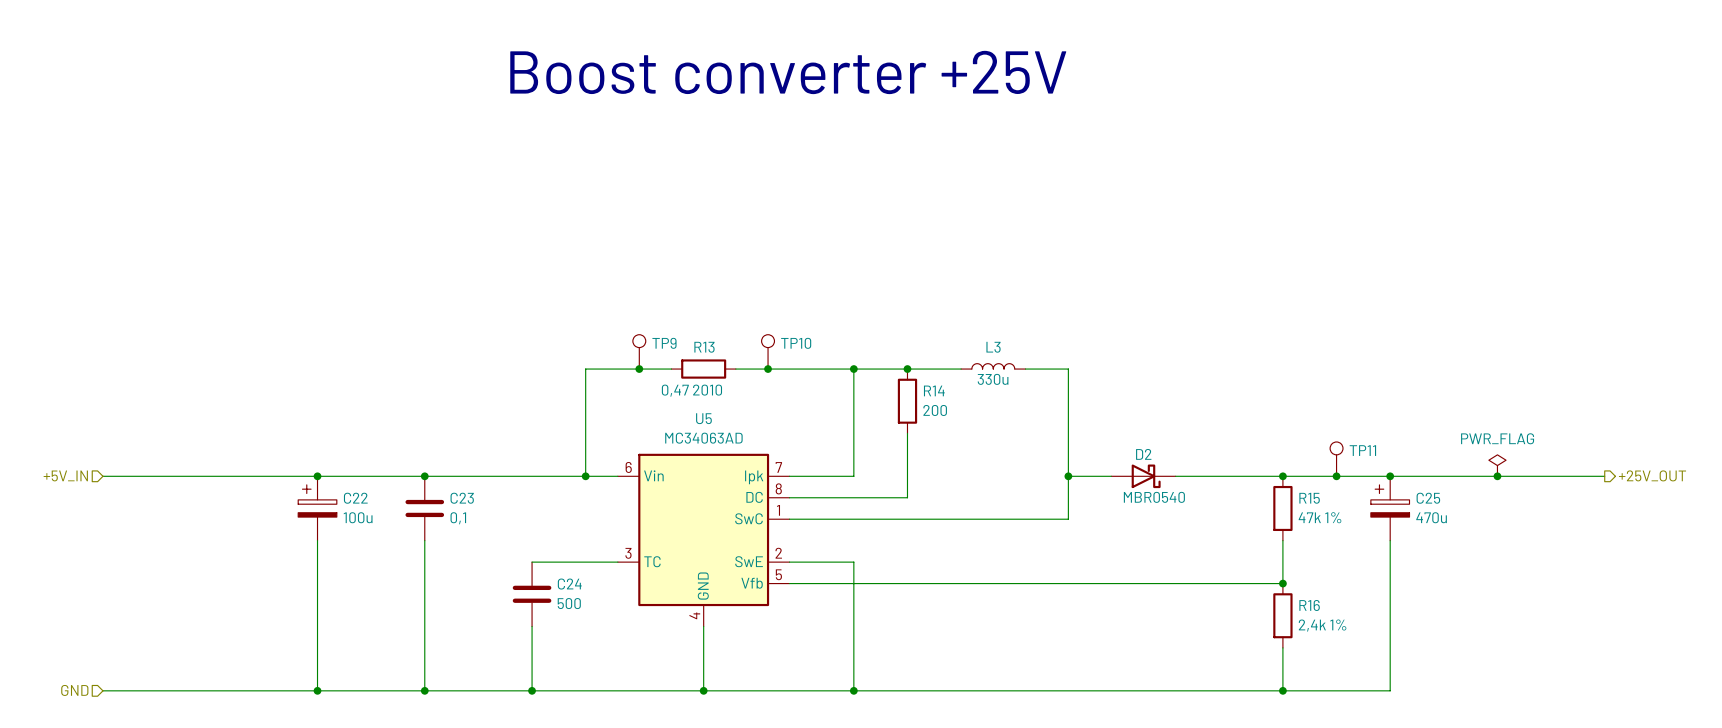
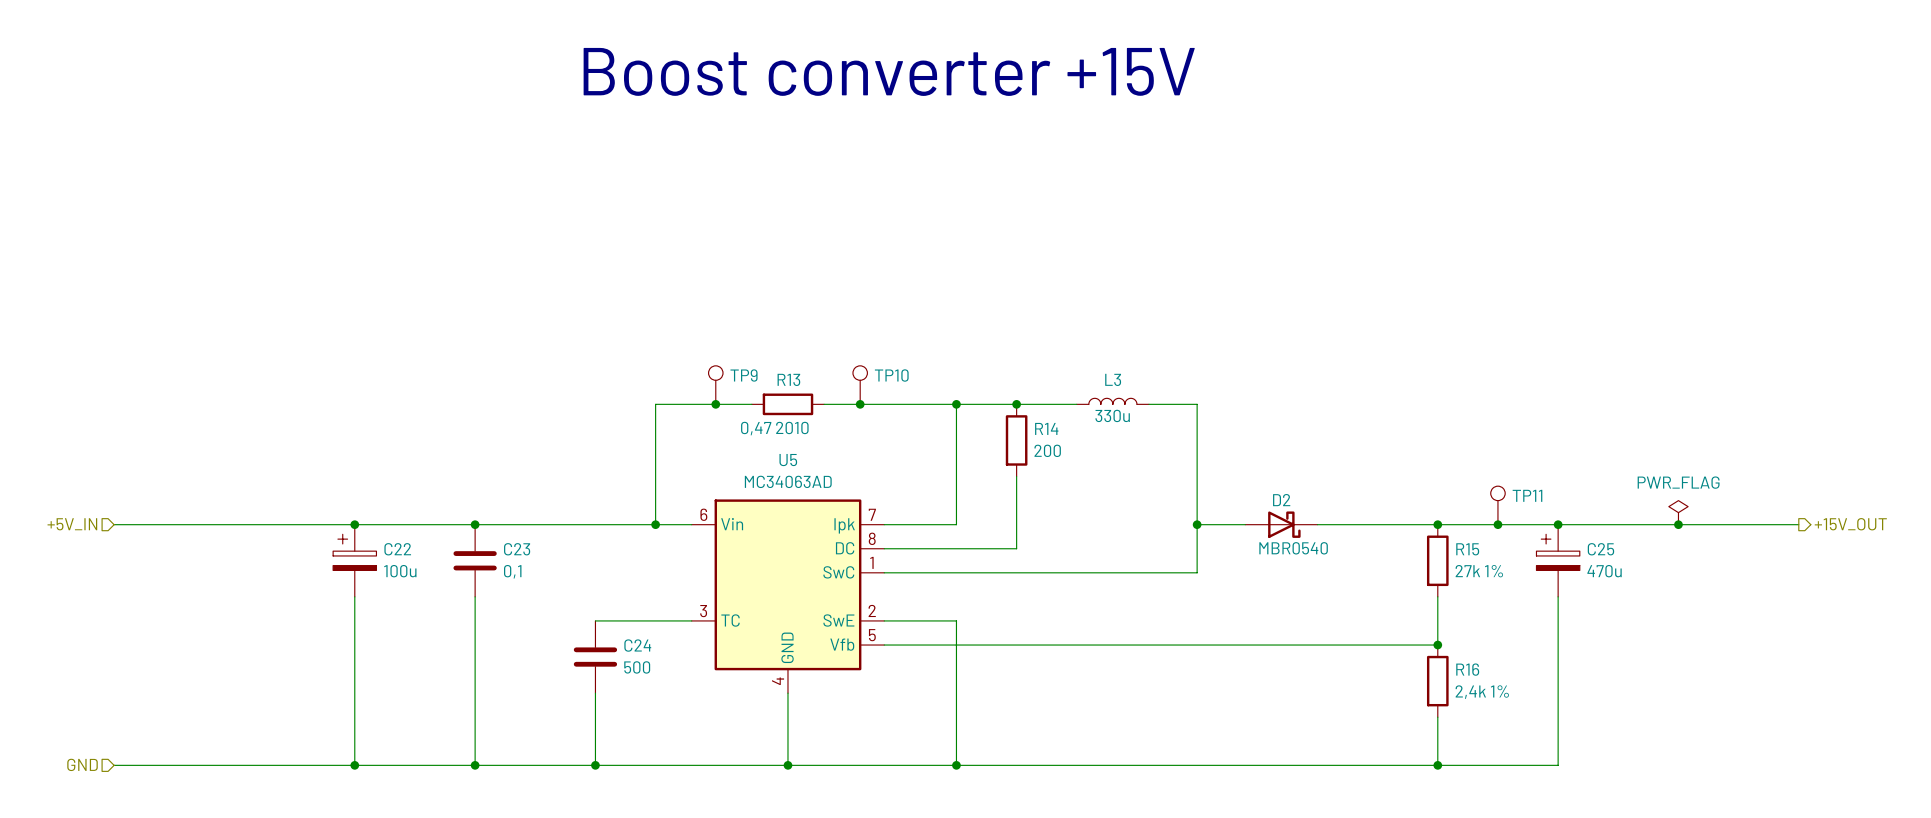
text: Boost converter +25V (788, 72) -> Boost converter +15V (889, 71)
hierarchical label: +25V_OUT (1652, 475) -> +15V_OUT (1850, 524)
R15 value: 47k 1% (1320, 517) -> 27k 1% (1479, 571)

